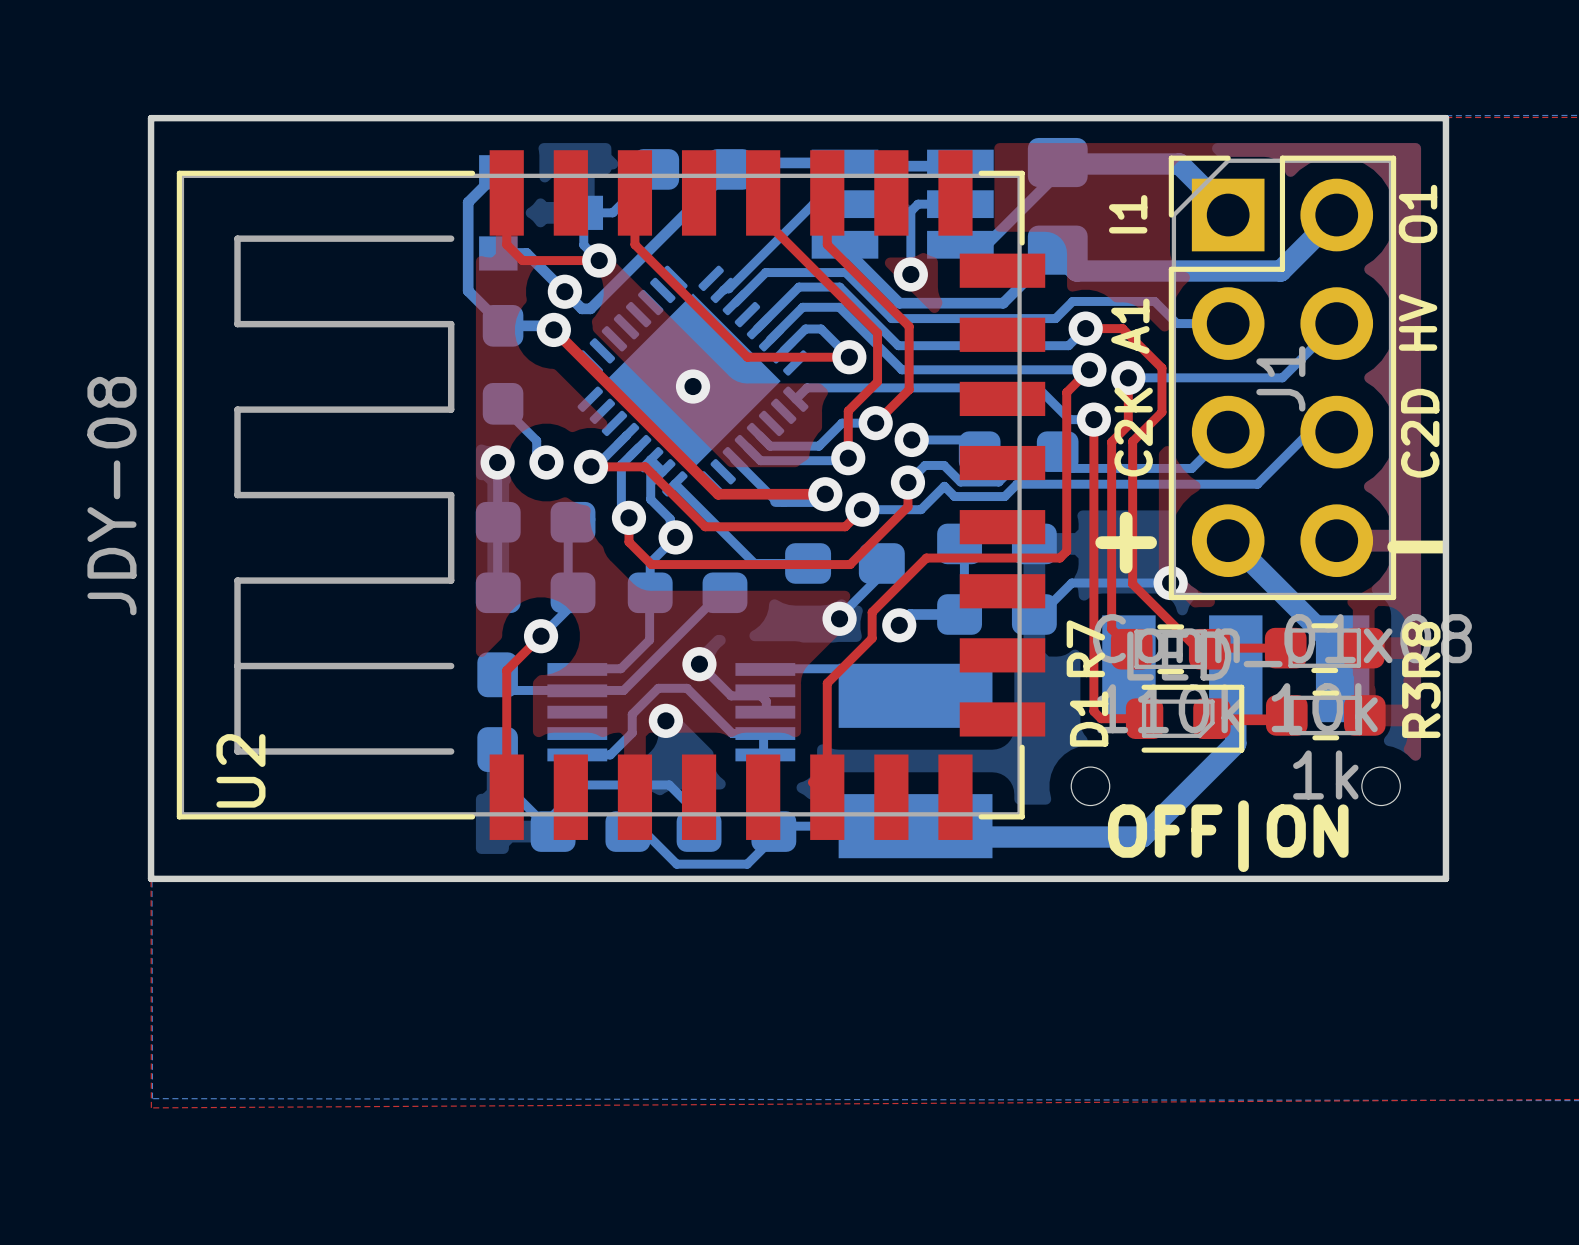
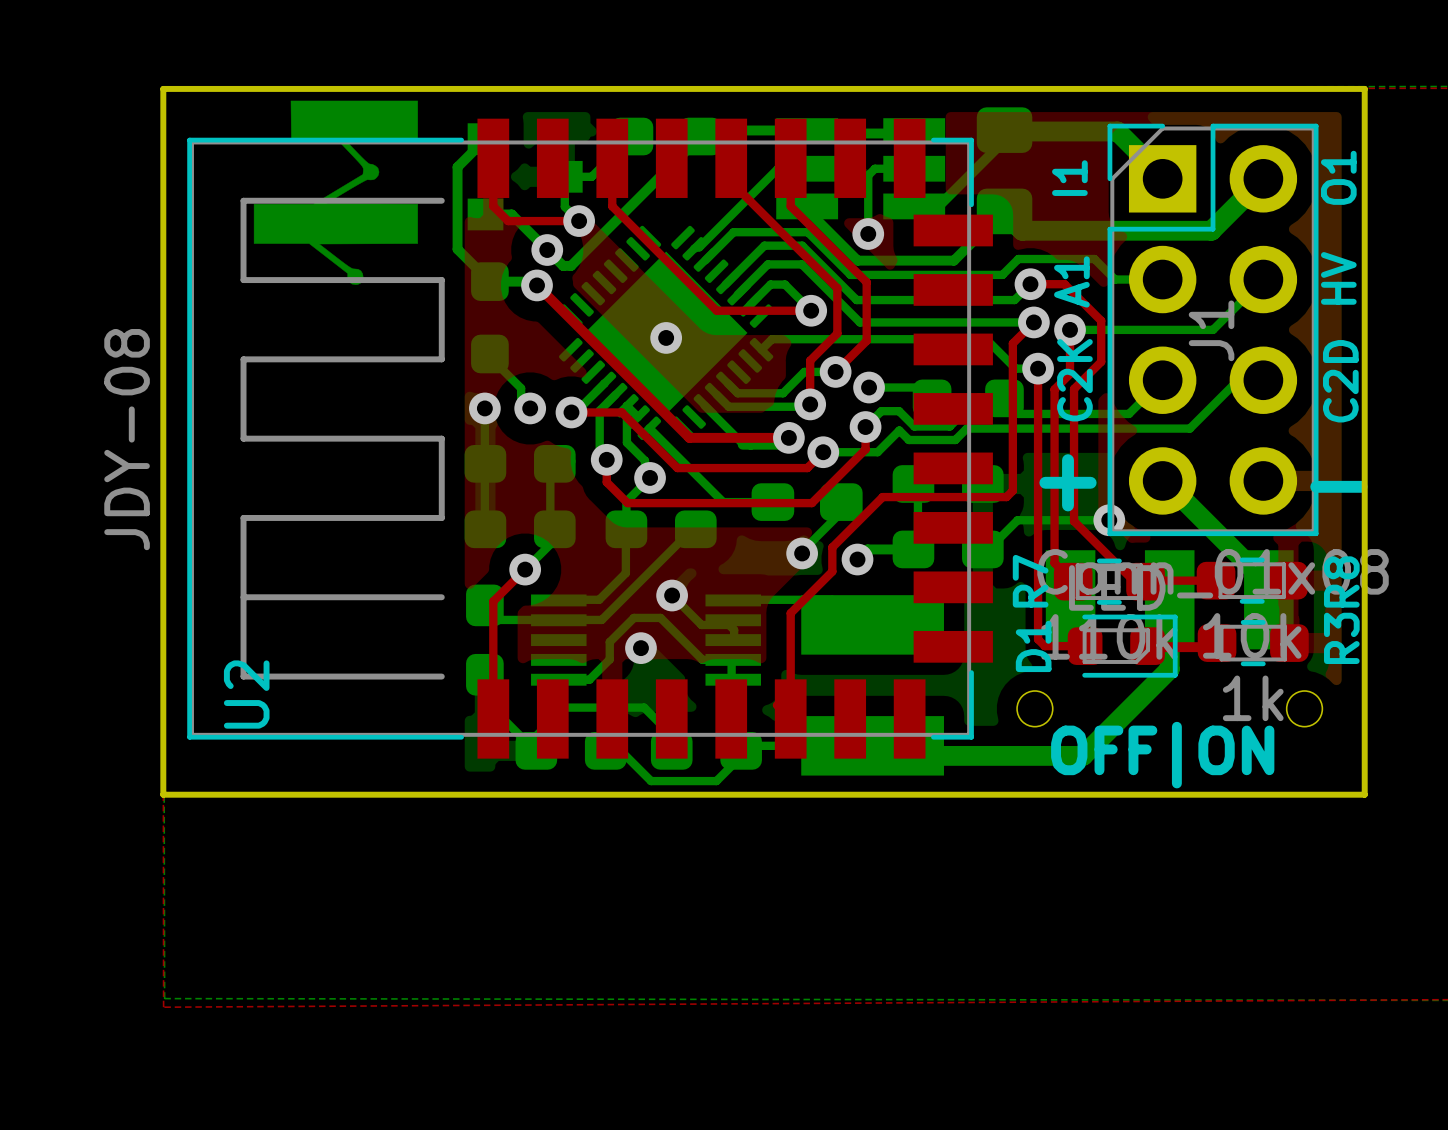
drawing: none -> [253, 100, 418, 285]

